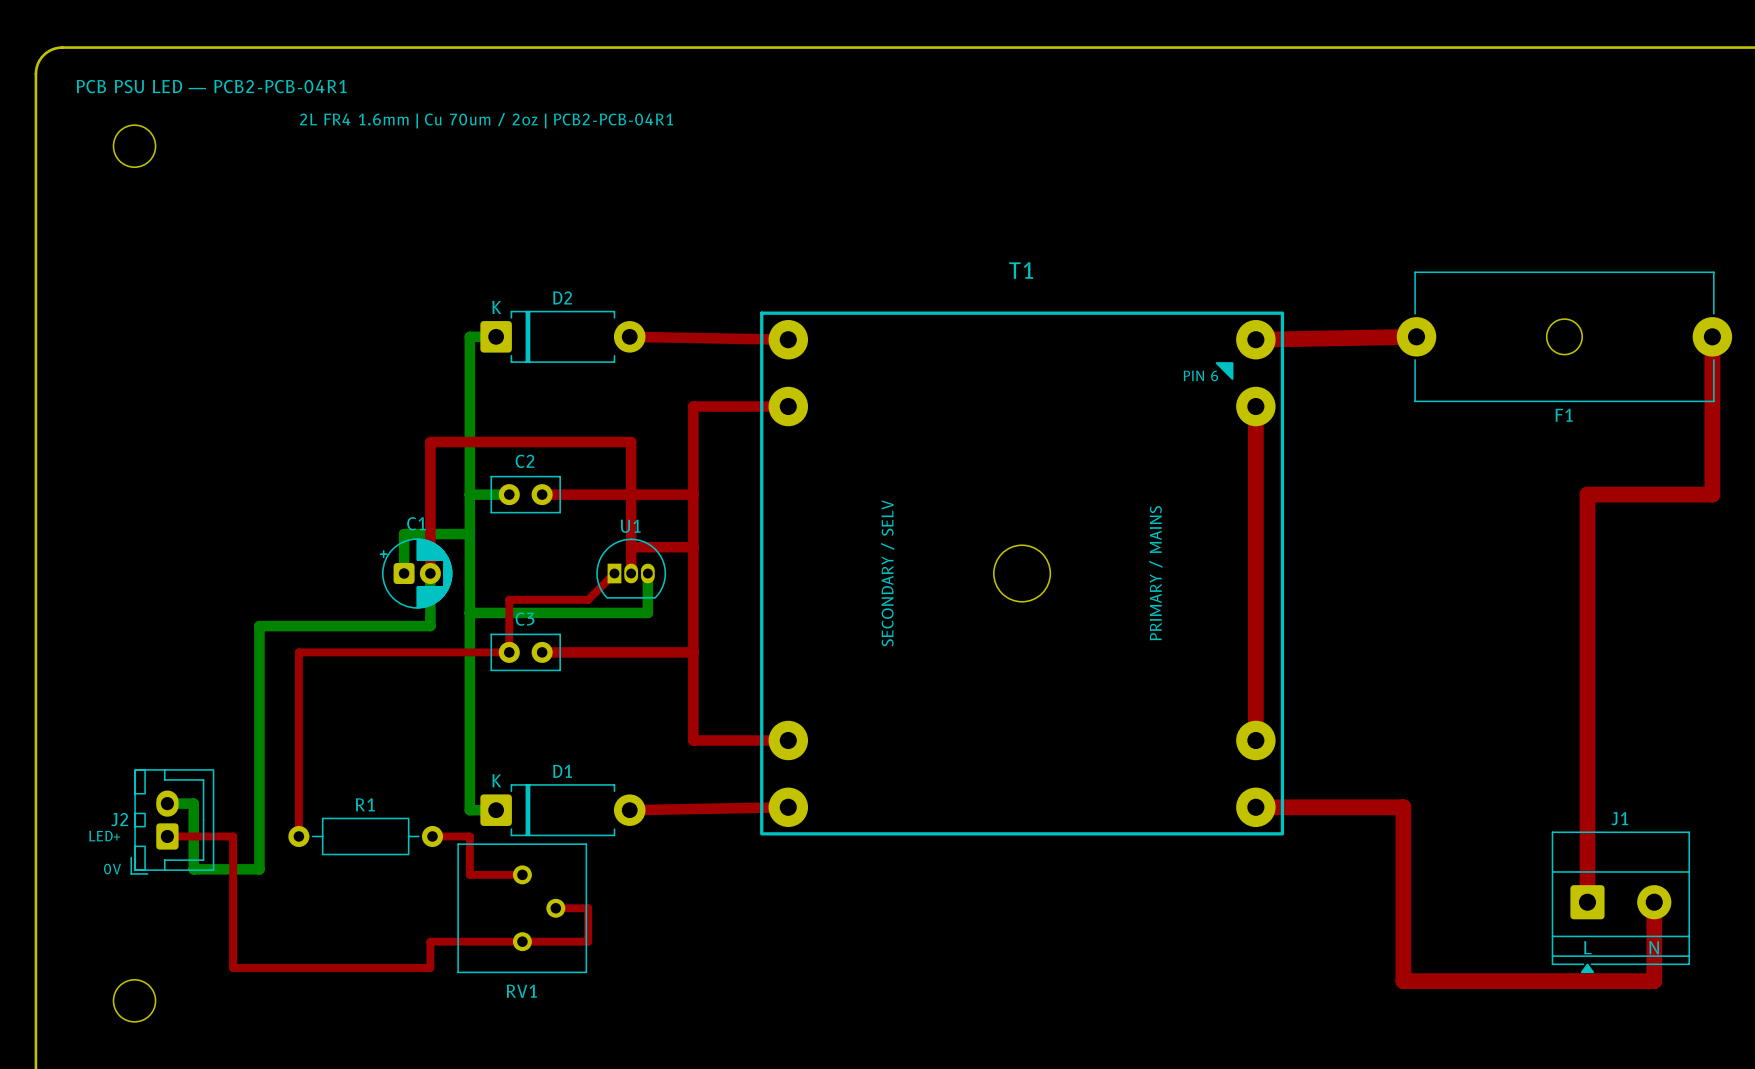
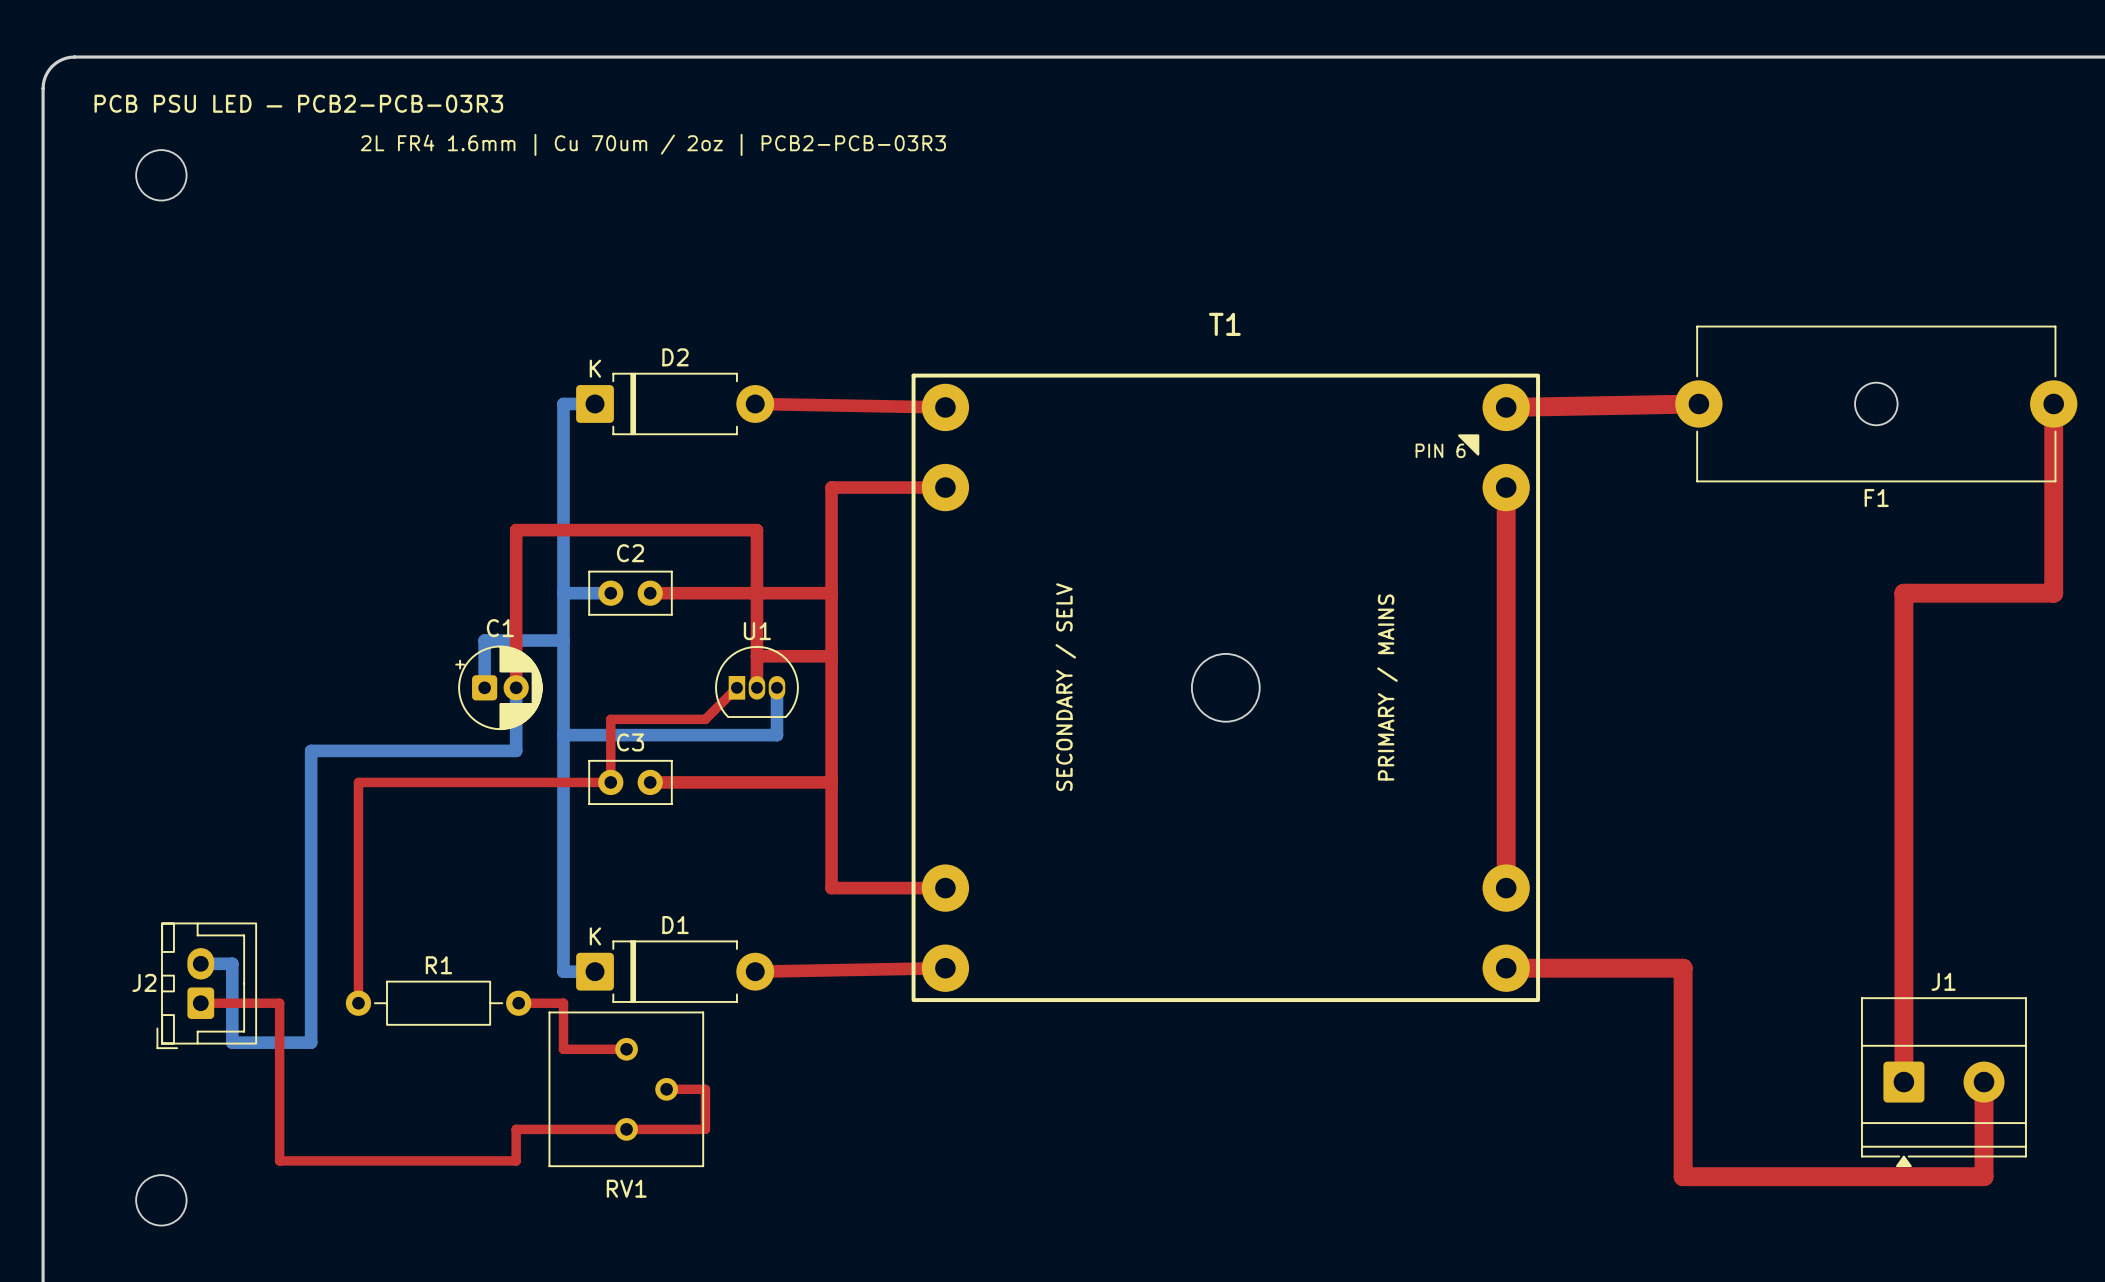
text: PCB PSU LED — PCB2-PCB-04R1 (211, 86) -> PCB PSU LED — PCB2-PCB-03R3 (298, 103)
text: 2L FR4 1.6mm | Cu 70um / 2oz | PCB2-PCB-04R1 (486, 120) -> 2L FR4 1.6mm | Cu 70um / 2oz | PCB2-PCB-03R3 (653, 144)
text: LED+ (104, 836) -> none
text: 0V (112, 869) -> none
text: L (1587, 947) -> none
text: N (1654, 947) -> none

